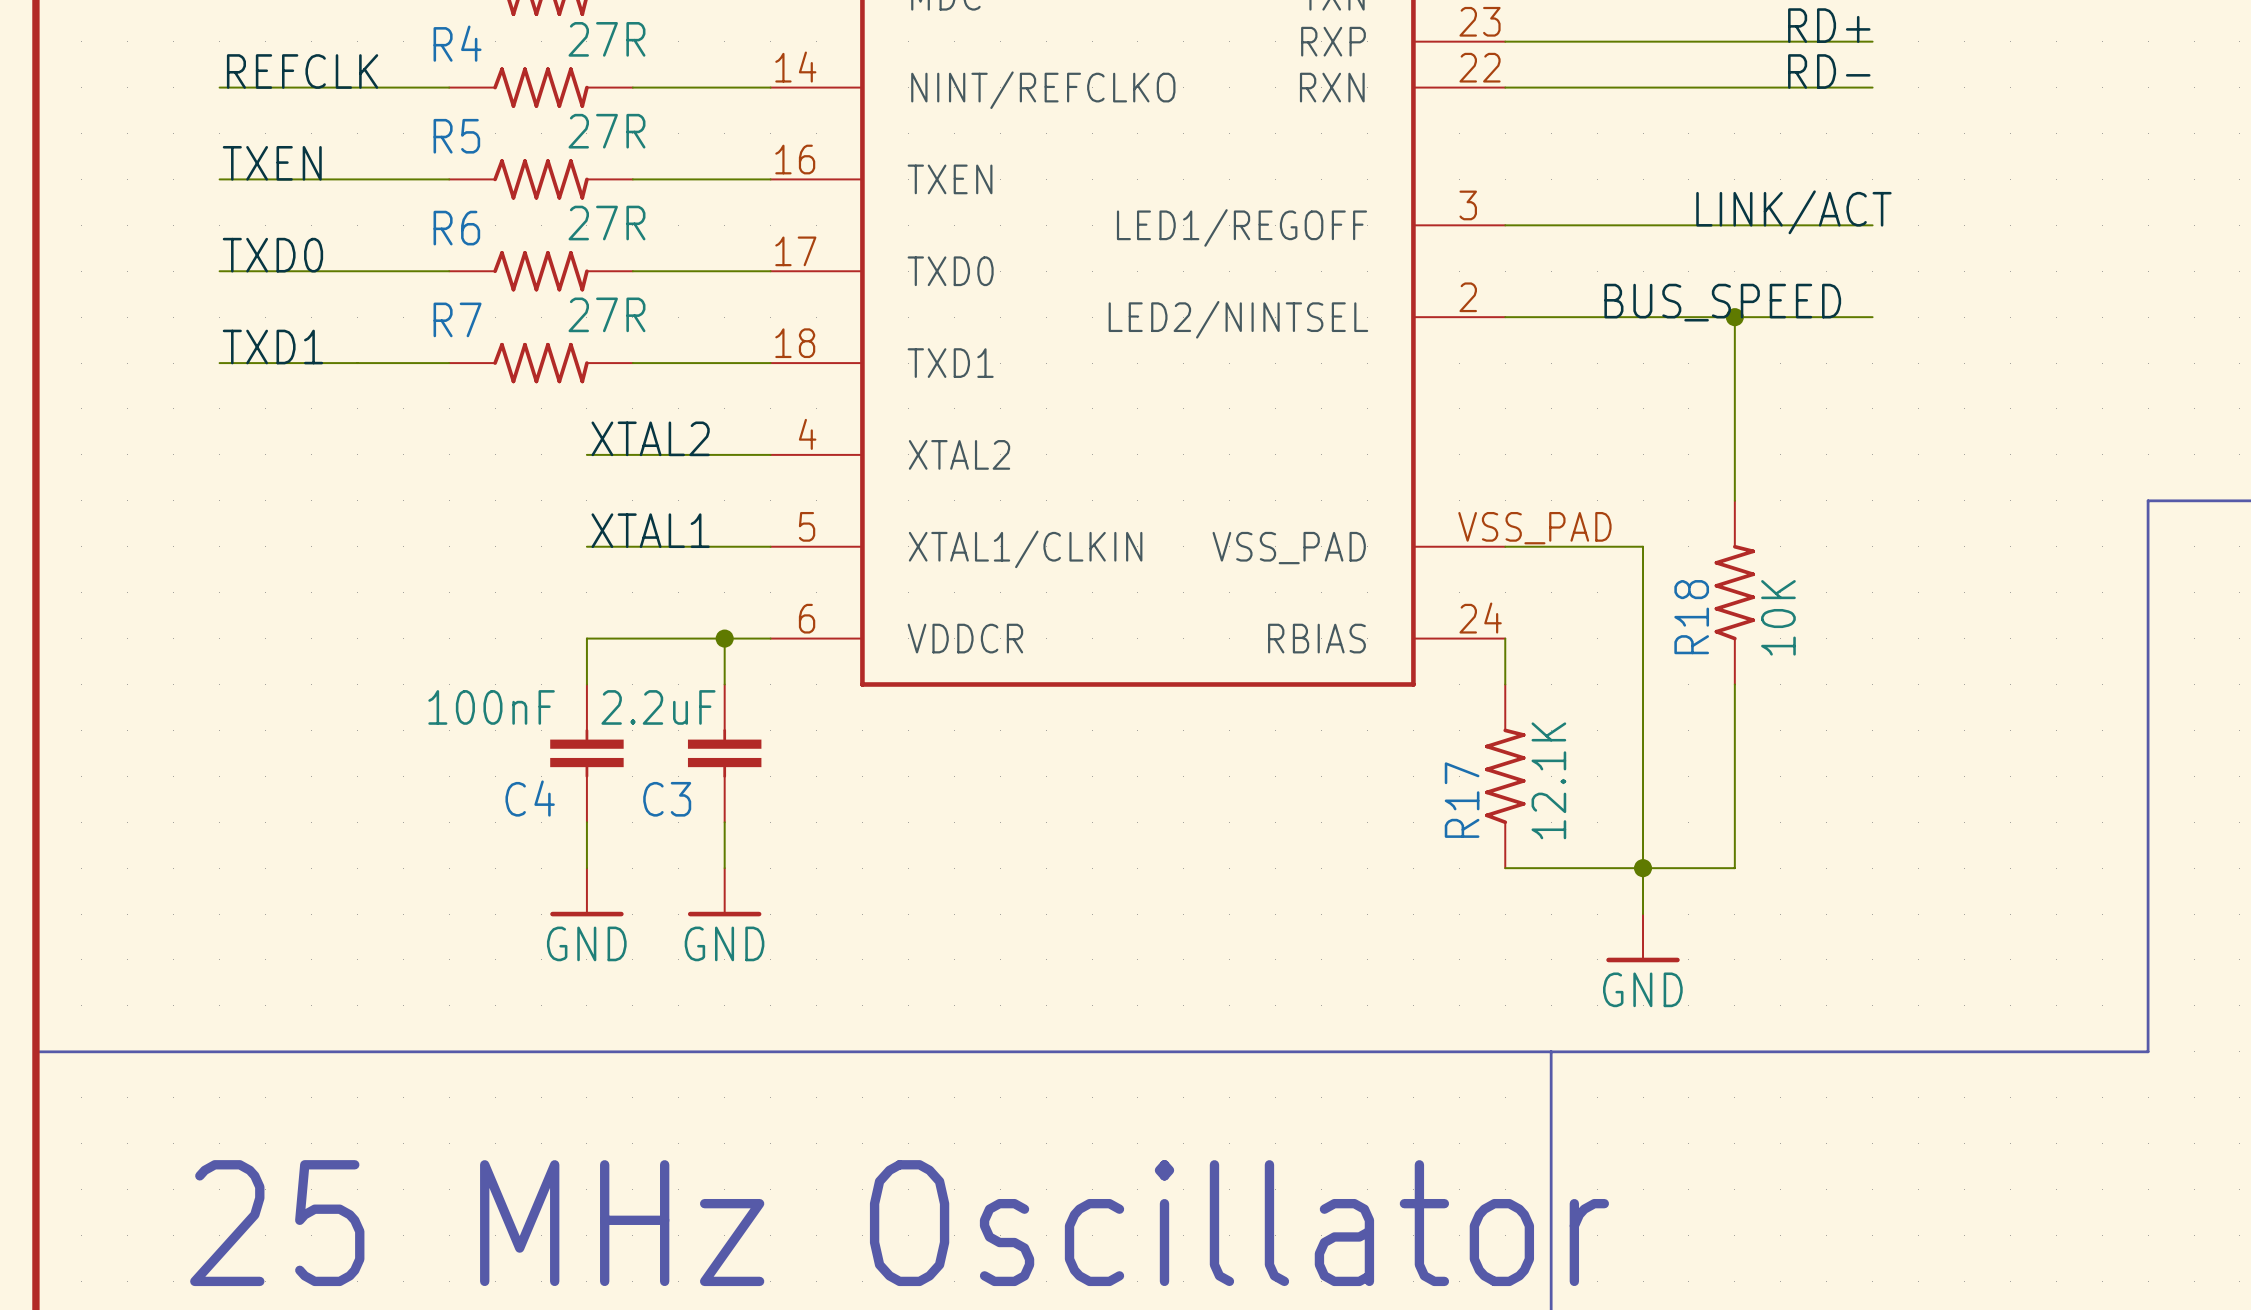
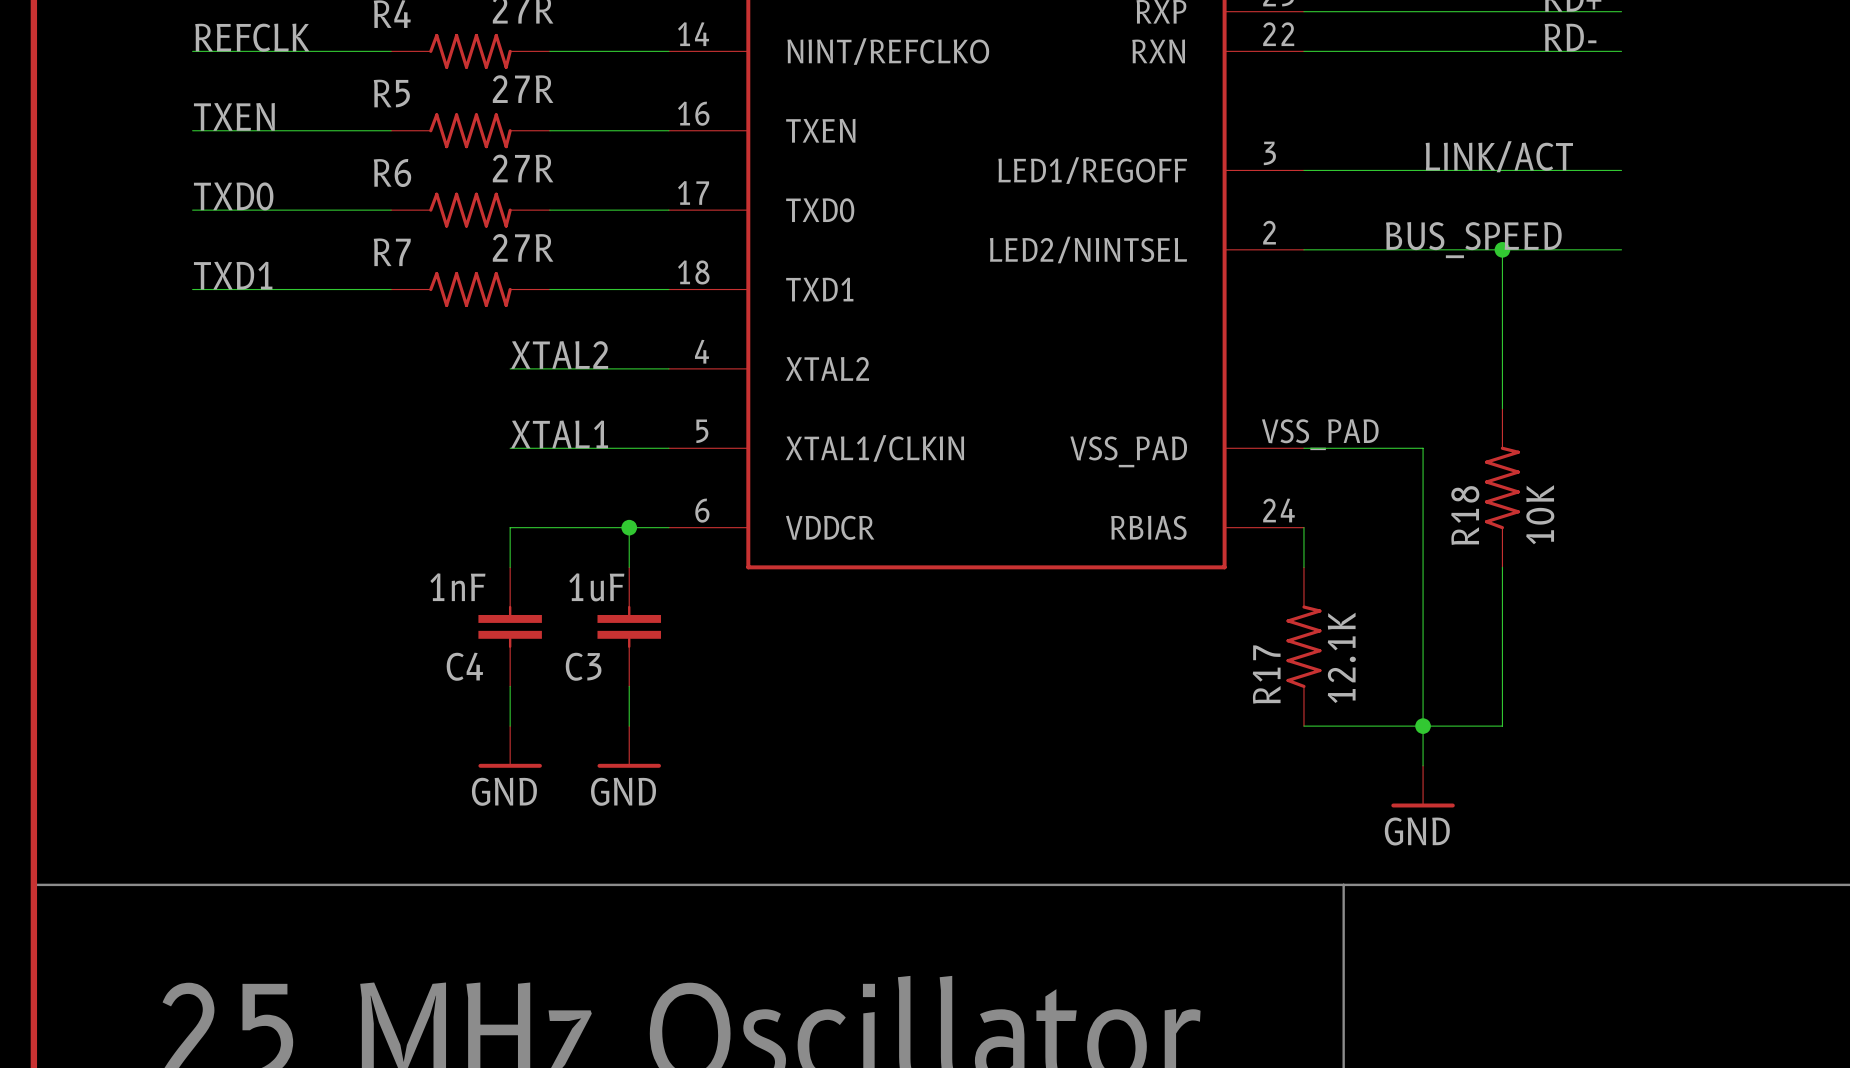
label position: LINK/ACT (1793, 212) -> LINK/ACT (1499, 156)
C4 value: 100nF (491, 707) -> 1nF (457, 587)
C3 value: 2.2uF (658, 707) -> 1uF (596, 587)

